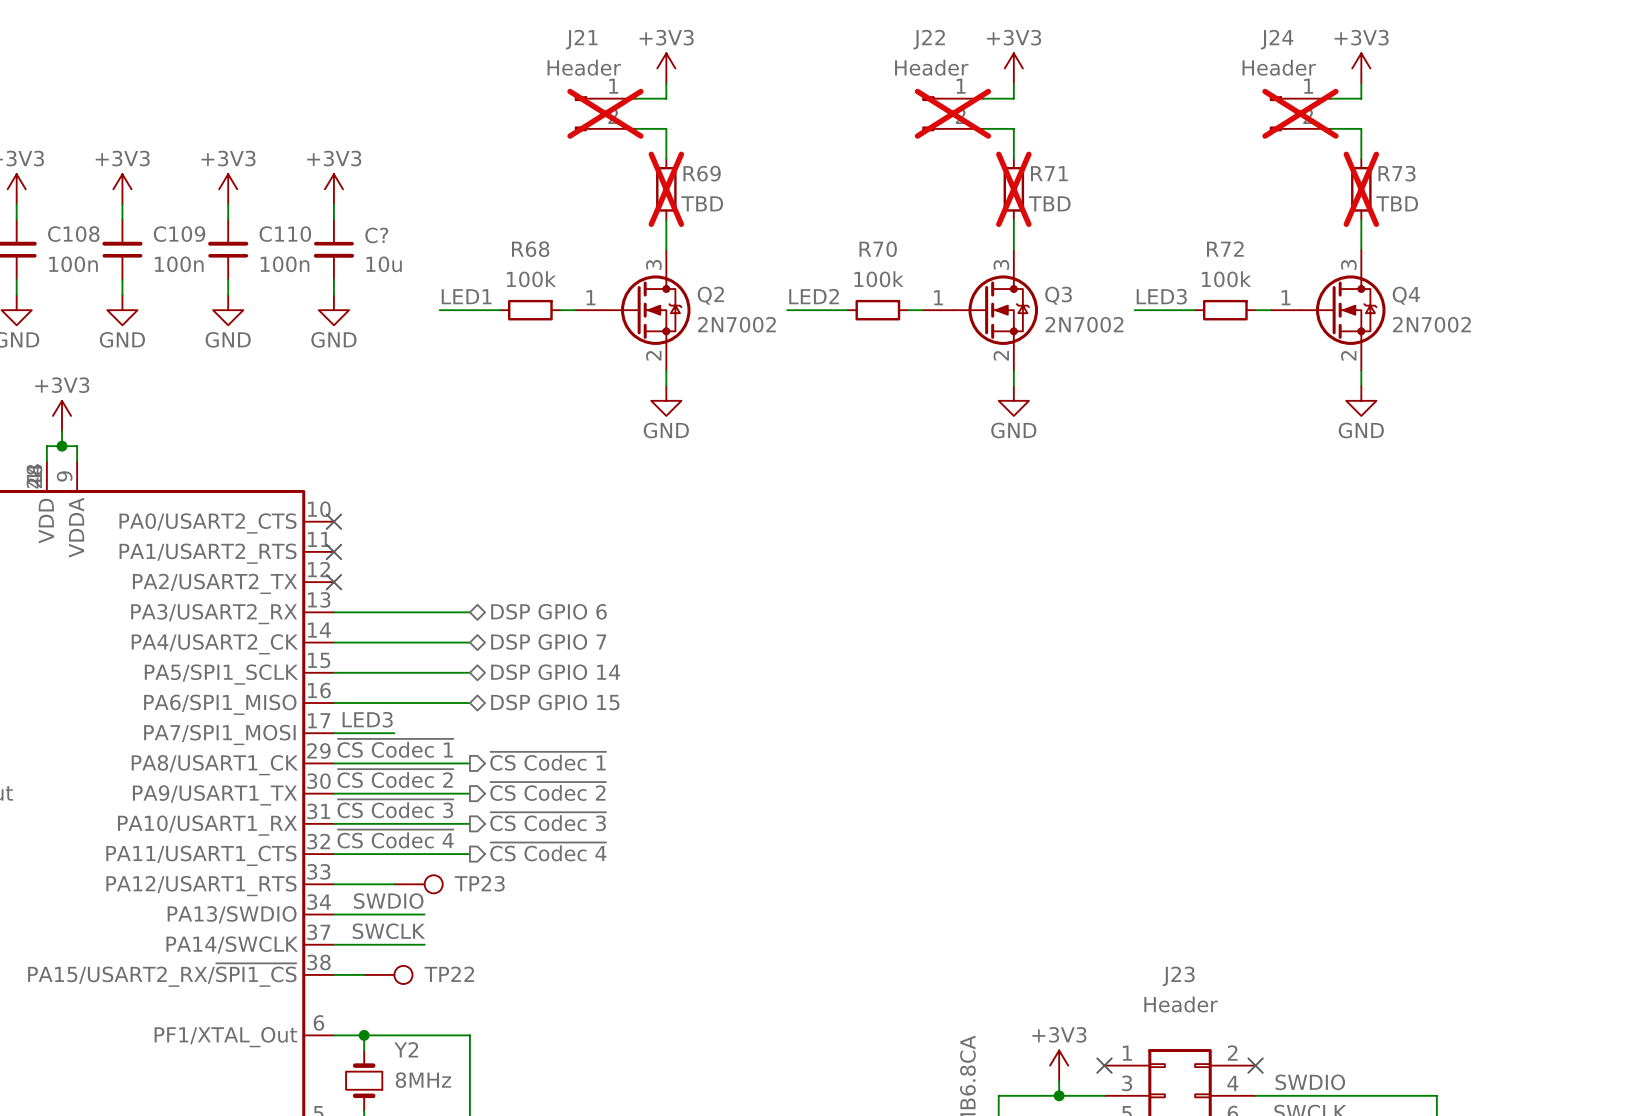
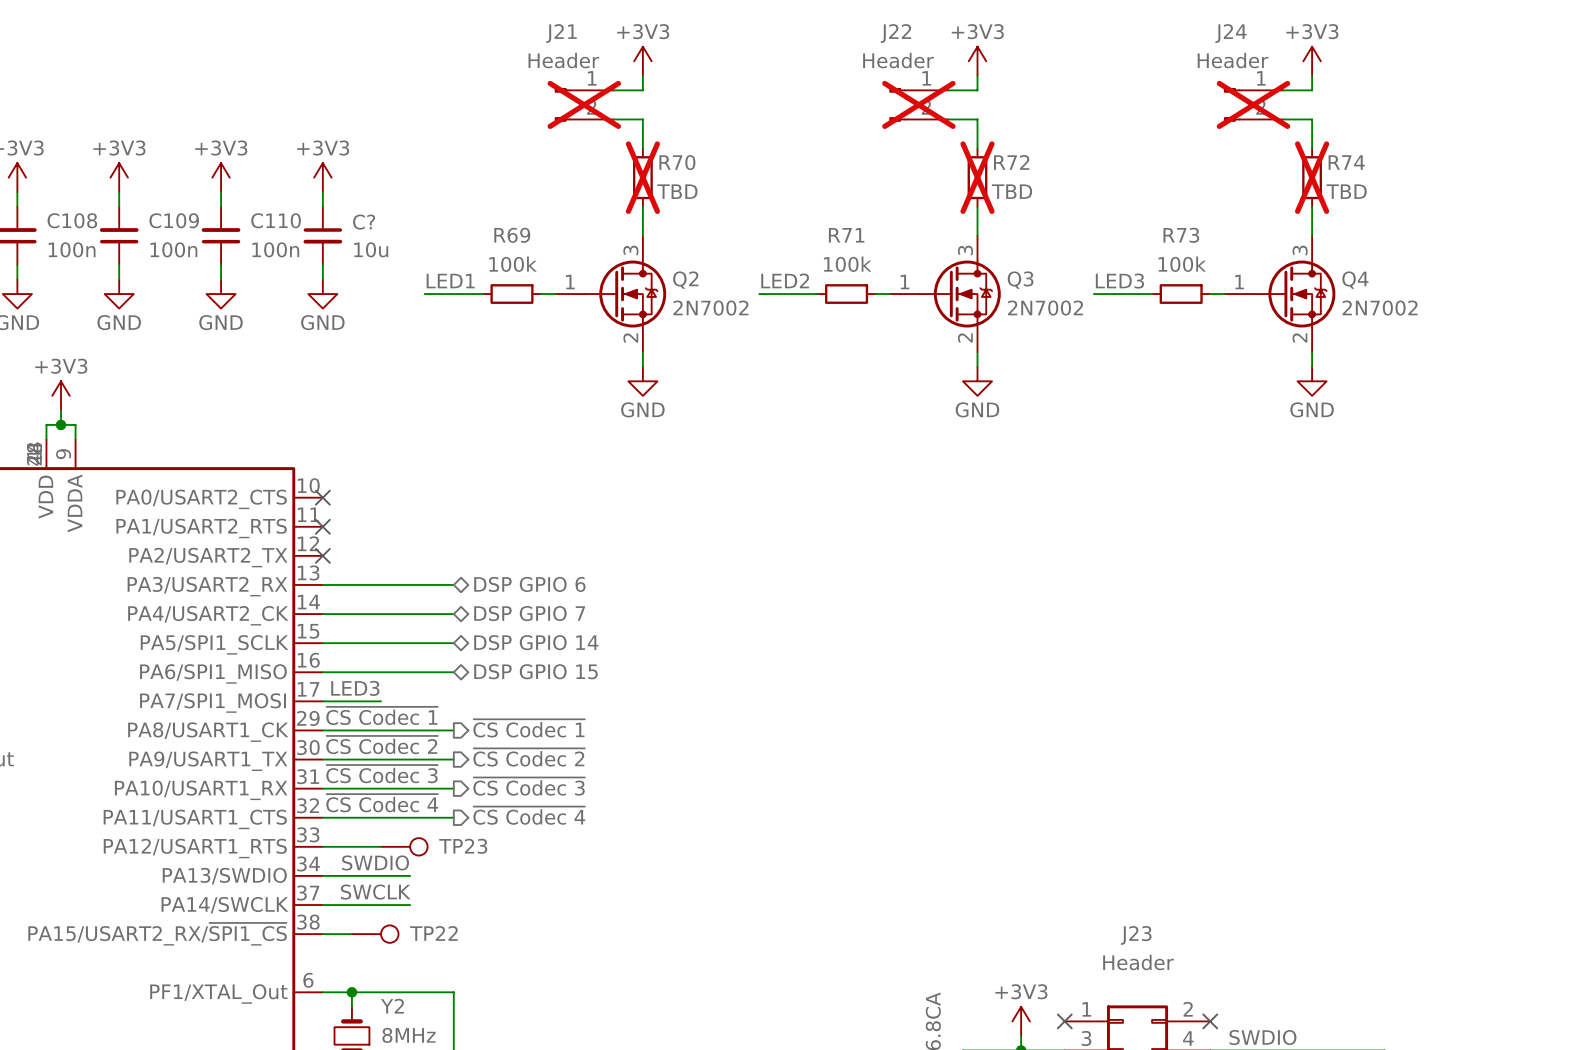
R69 name: R69 (702, 173) -> R70 (677, 162)
R71 name: R71 (1049, 173) -> R72 (1011, 162)
R73 name: R73 (1397, 173) -> R74 (1346, 162)
R68 name: R68 (530, 249) -> R69 (512, 235)
R70 name: R70 (878, 249) -> R71 (846, 235)
R72 name: R72 (1225, 249) -> R73 (1181, 235)

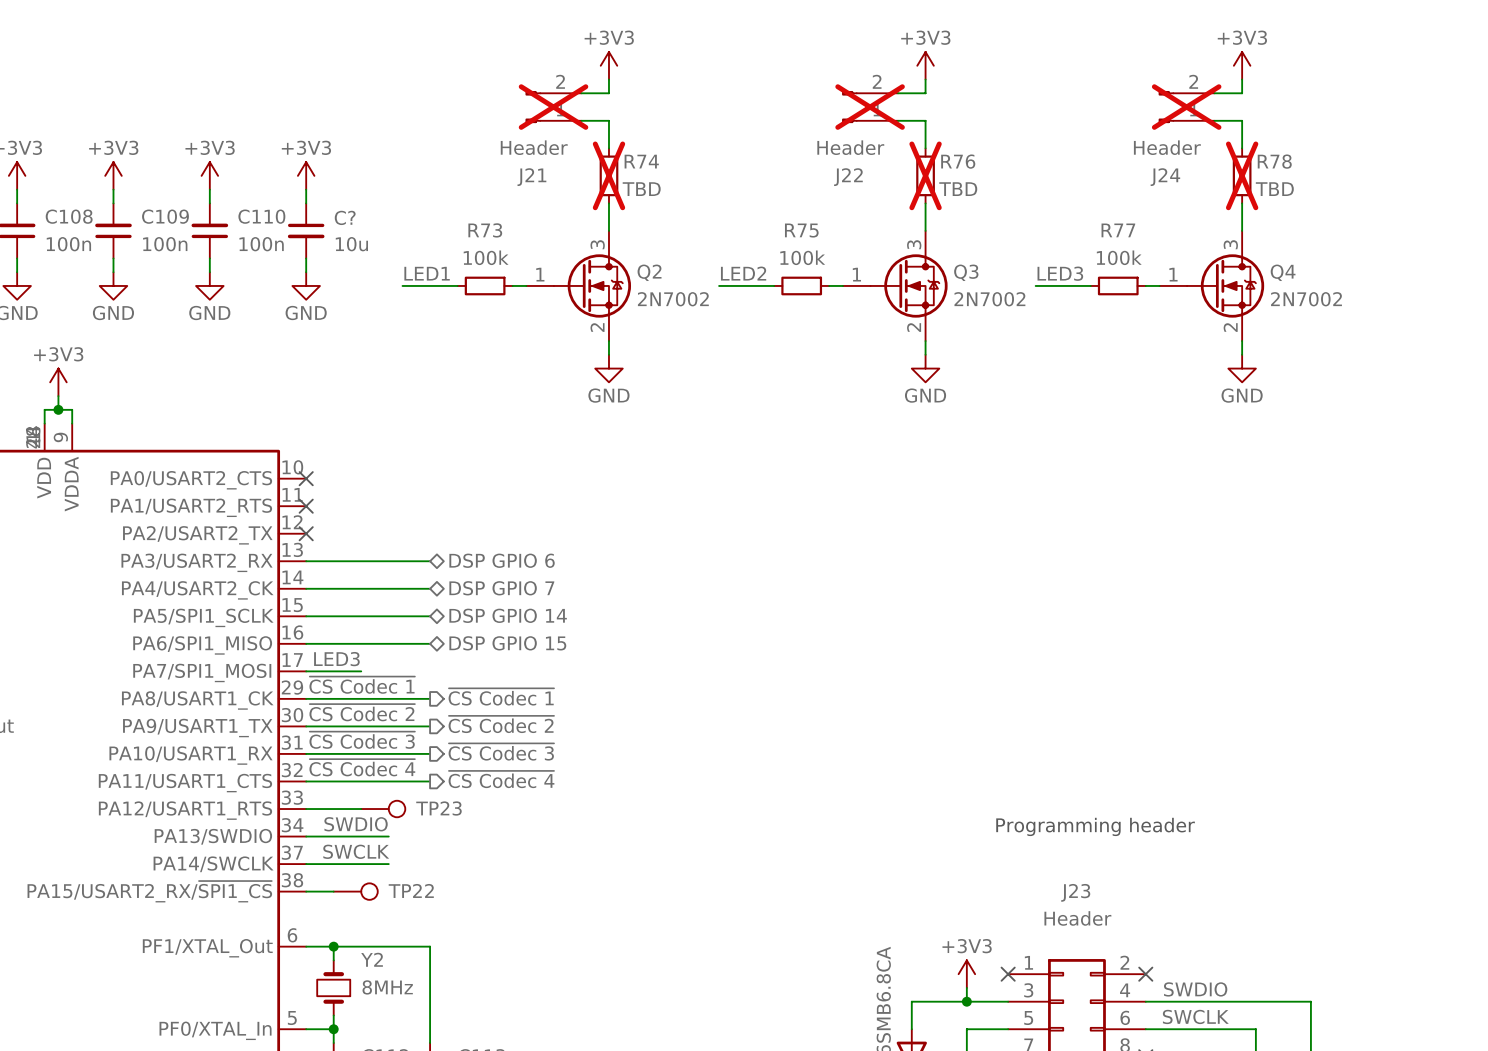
J21 flip: as is (562, 104) -> up-down (533, 107)
J22 flip: as is (897, 104) -> up-down (849, 107)
J24 flip: as is (1232, 104) -> up-down (1166, 107)
R70 name: R70 (677, 162) -> R74 (641, 161)
R72 name: R72 (1011, 162) -> R76 (958, 161)
R74 name: R74 (1346, 162) -> R78 (1274, 161)
R69 name: R69 (512, 235) -> R73 (485, 230)
R71 name: R71 (846, 235) -> R75 (801, 230)
R73 name: R73 (1181, 235) -> R77 (1118, 230)
text: none -> Programming header (1095, 826)

